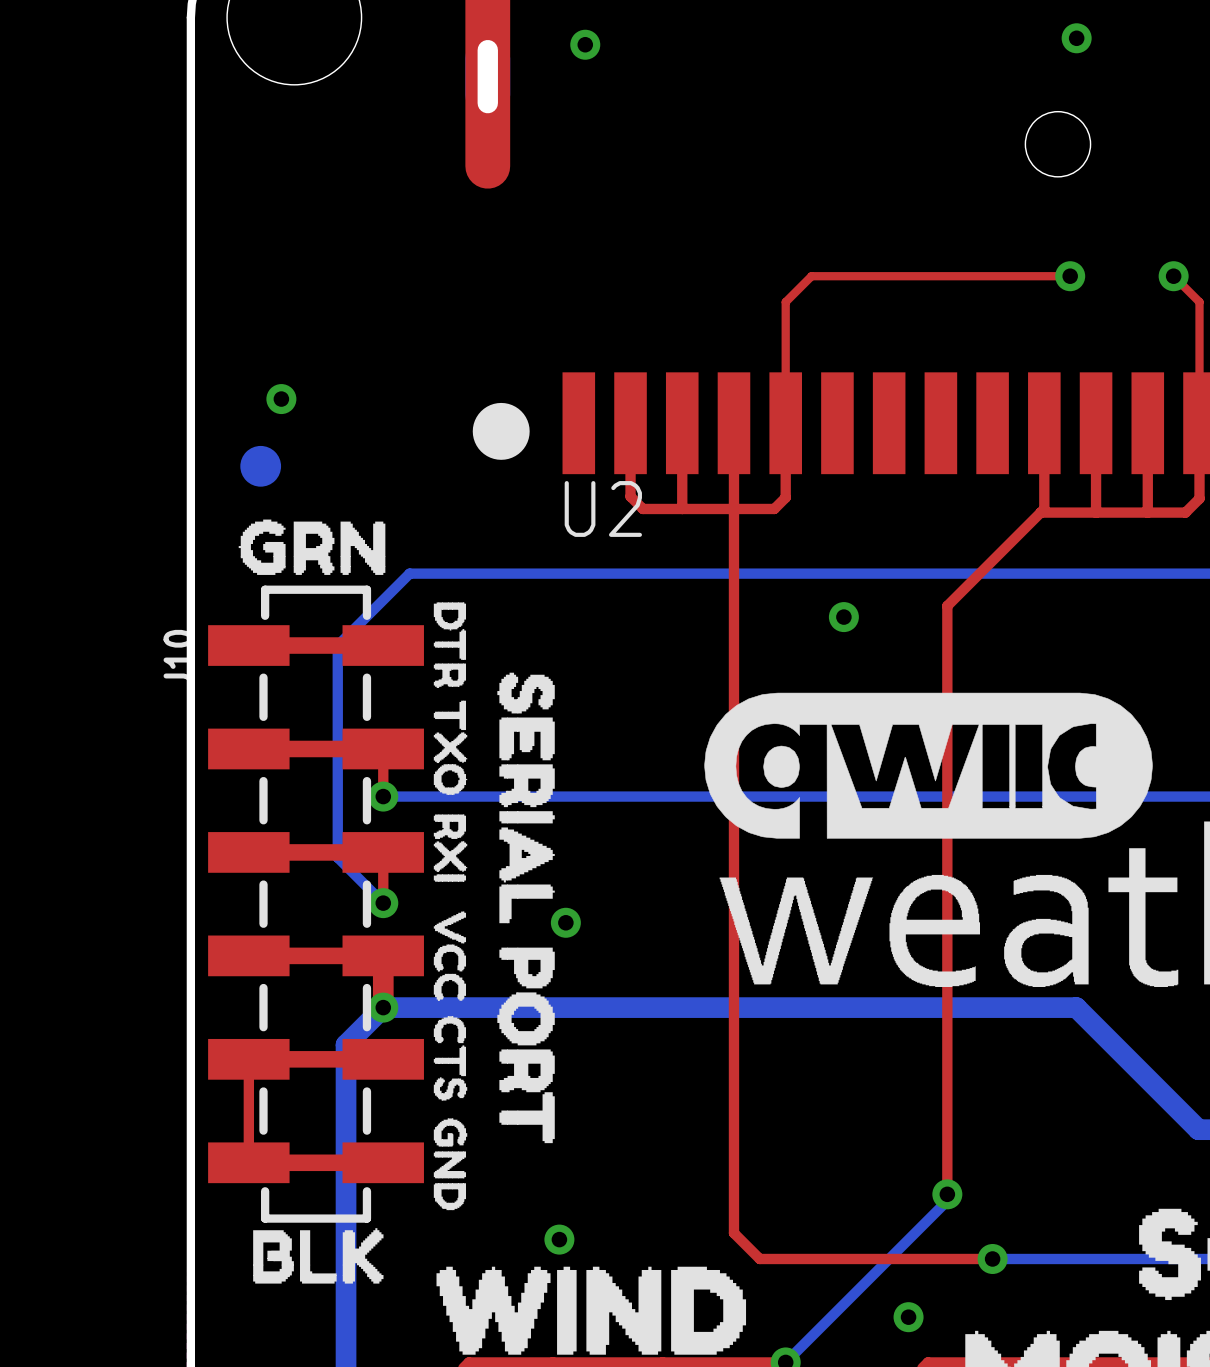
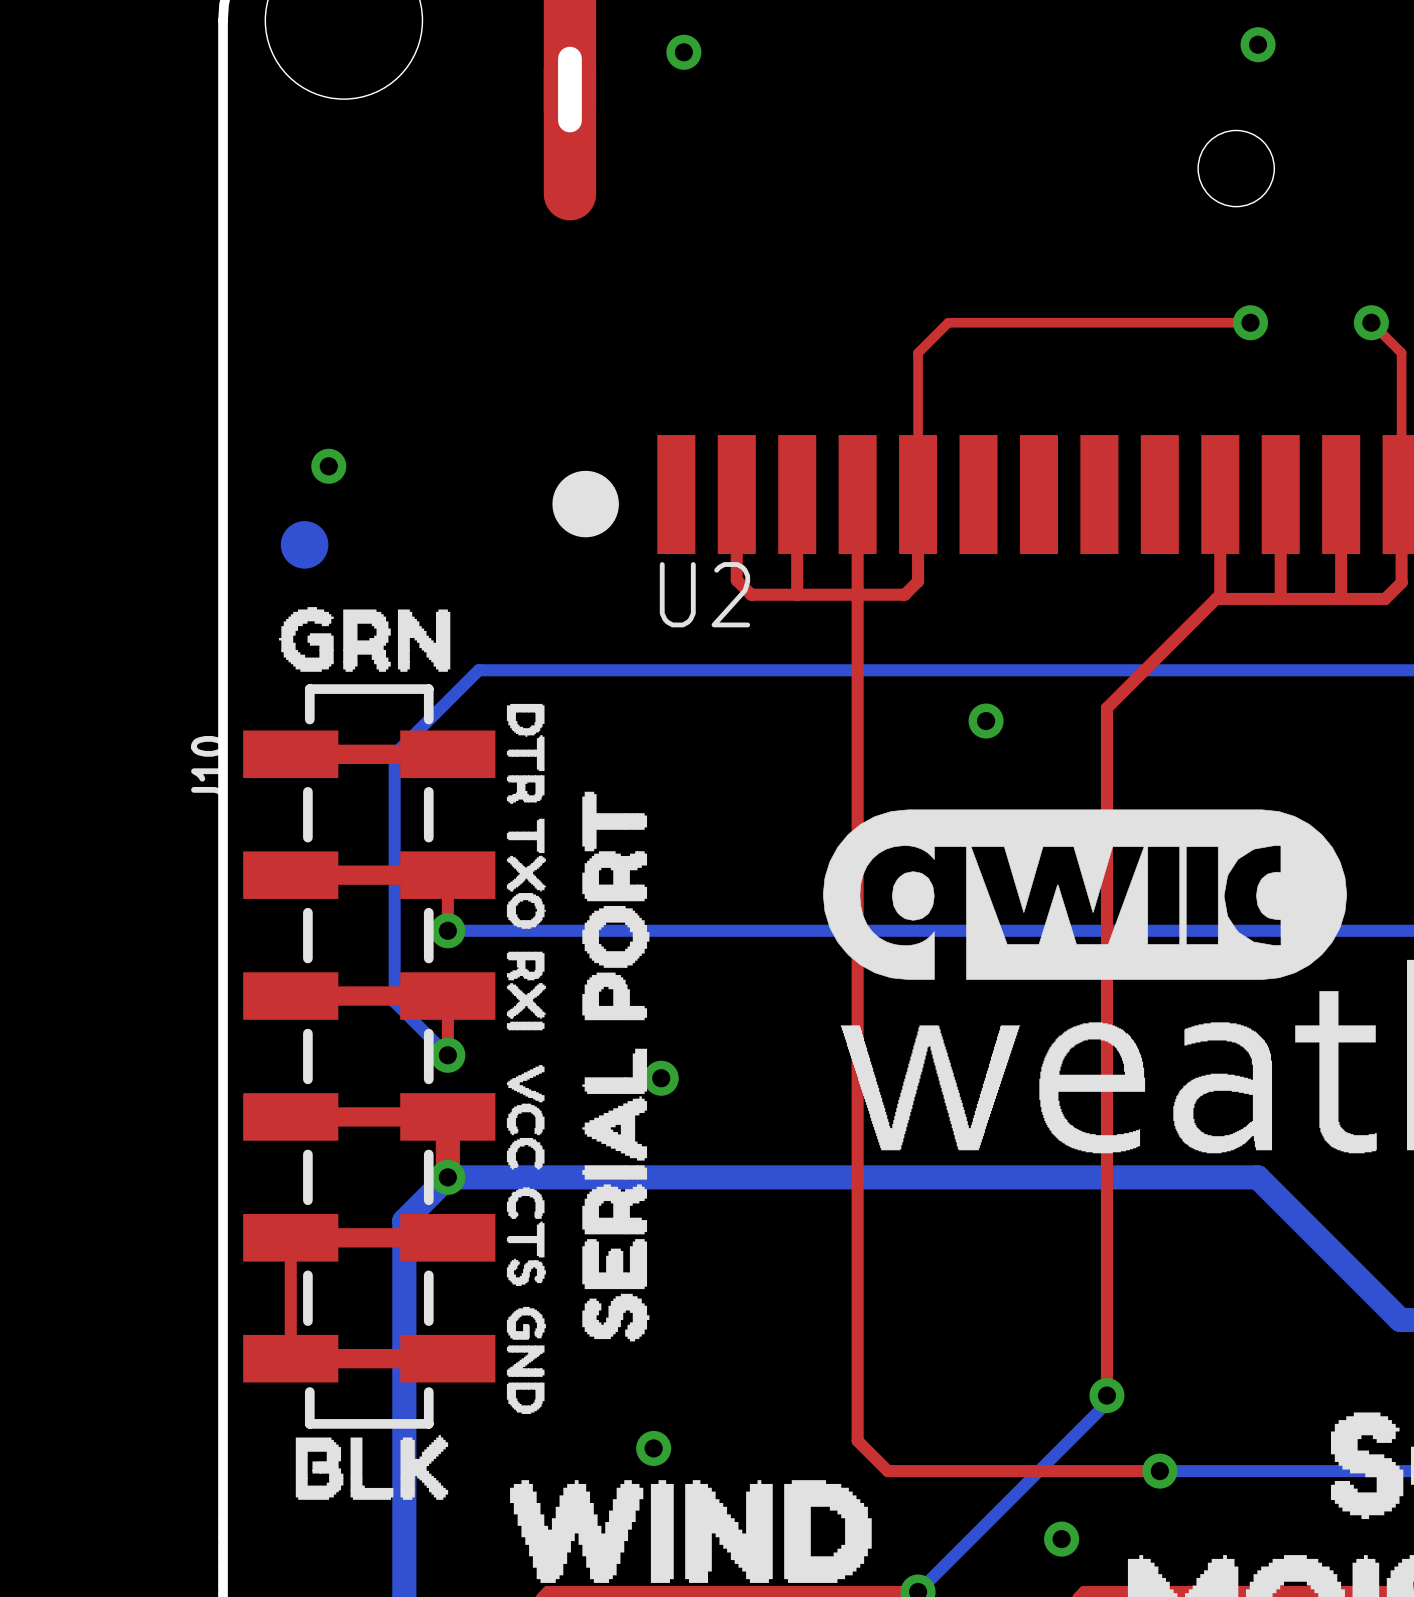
drawing shape: [497, 672, 555, 1144] -> [582, 791, 650, 1342]

